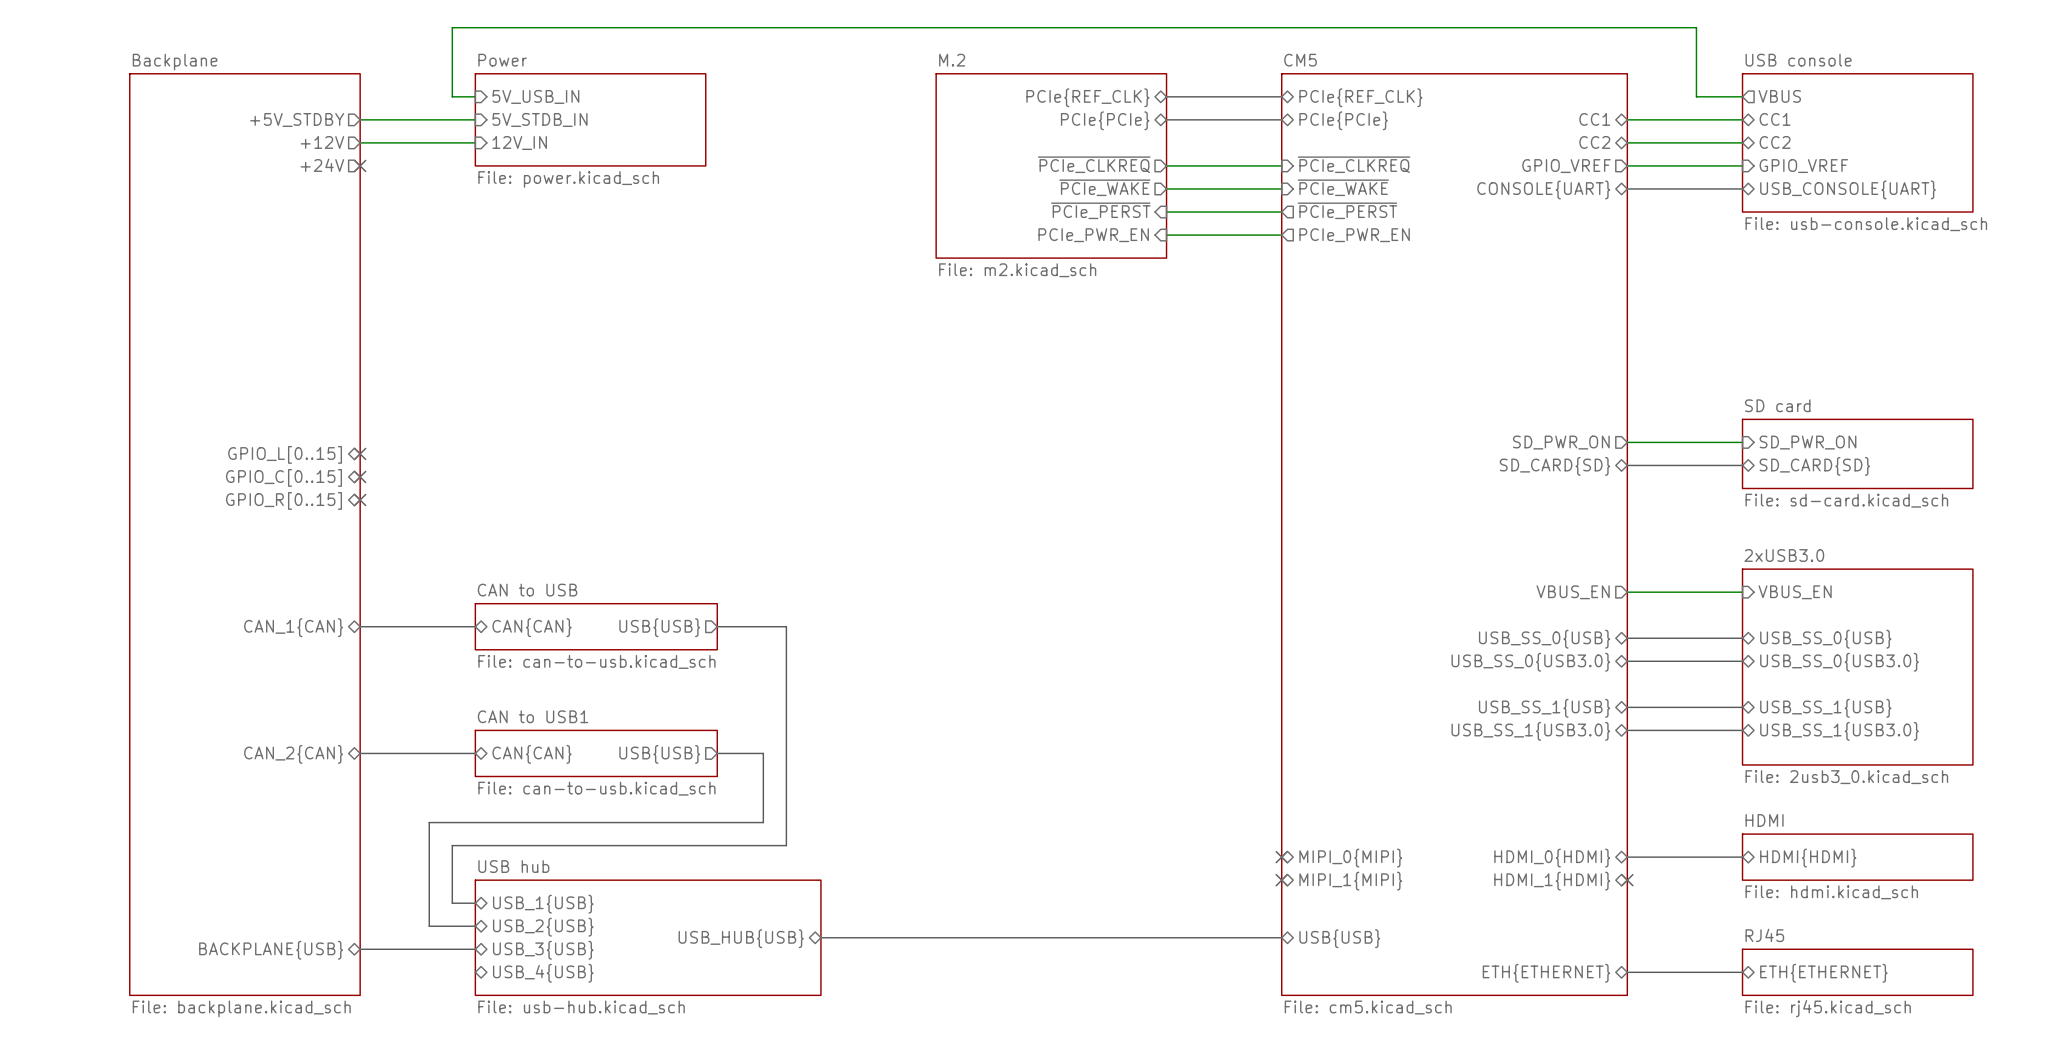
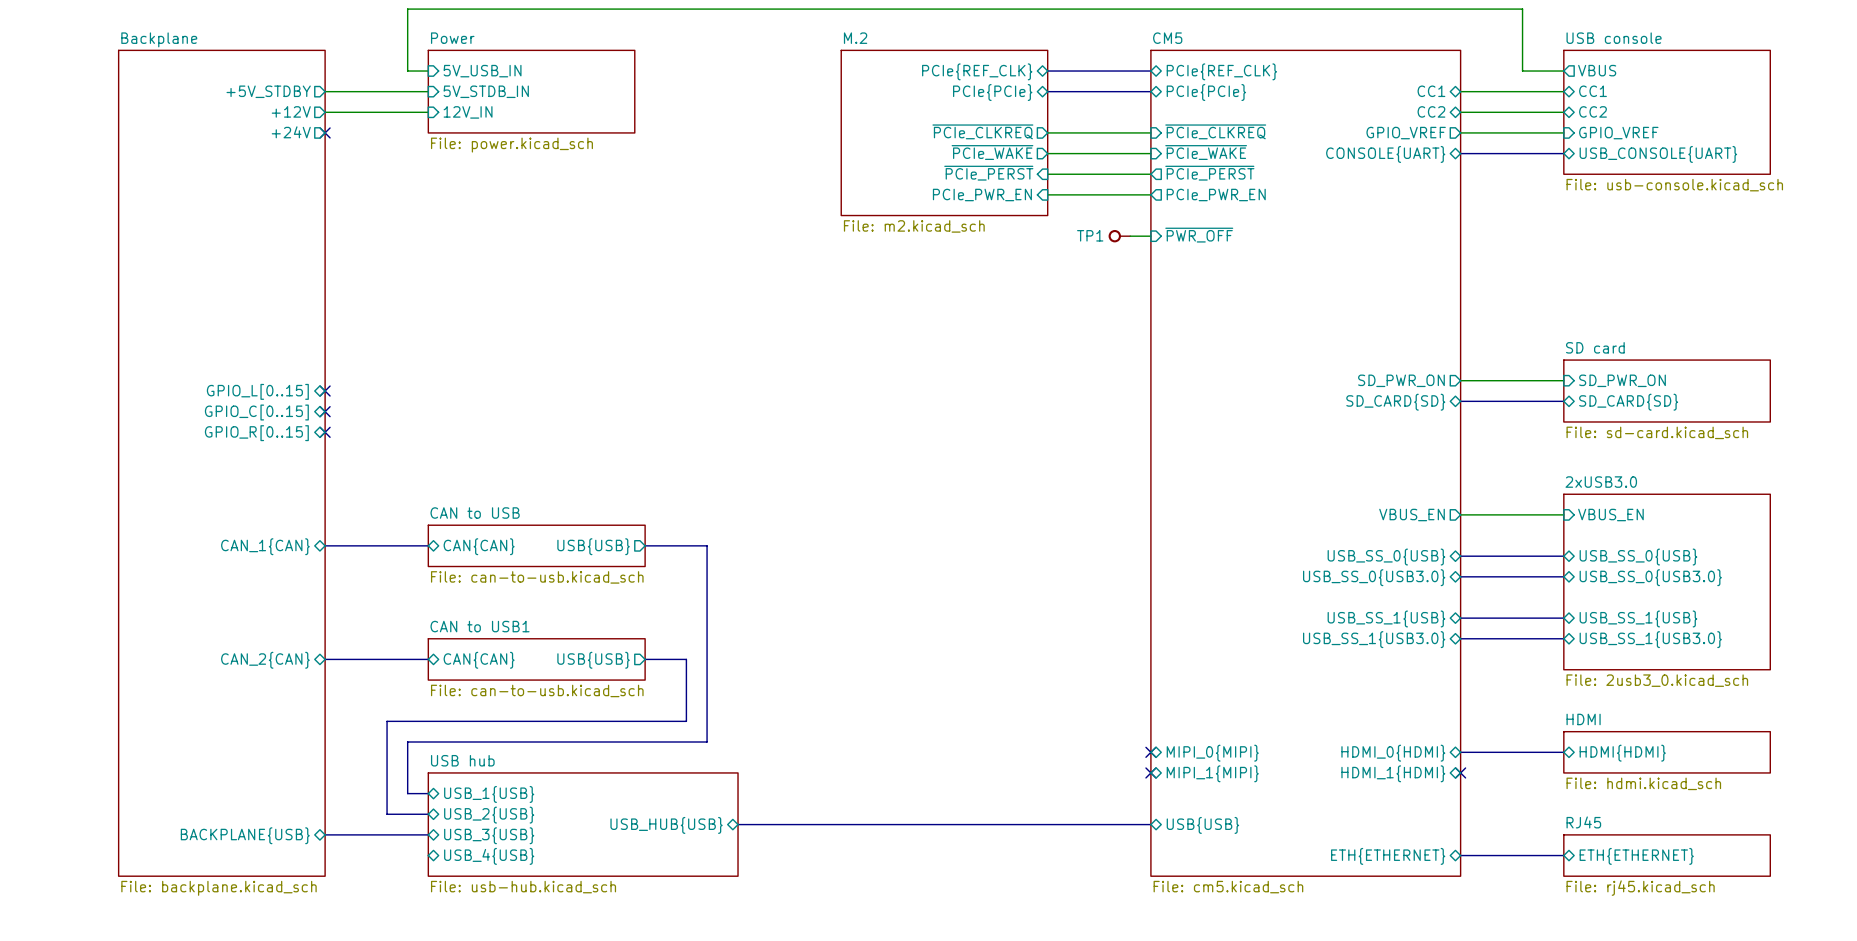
sheet pin: none -> ~{PWR_OFF} (1199, 235)
TP1: none -> (1119, 236)
wire: none -> (1130, 236) (1150, 236)

